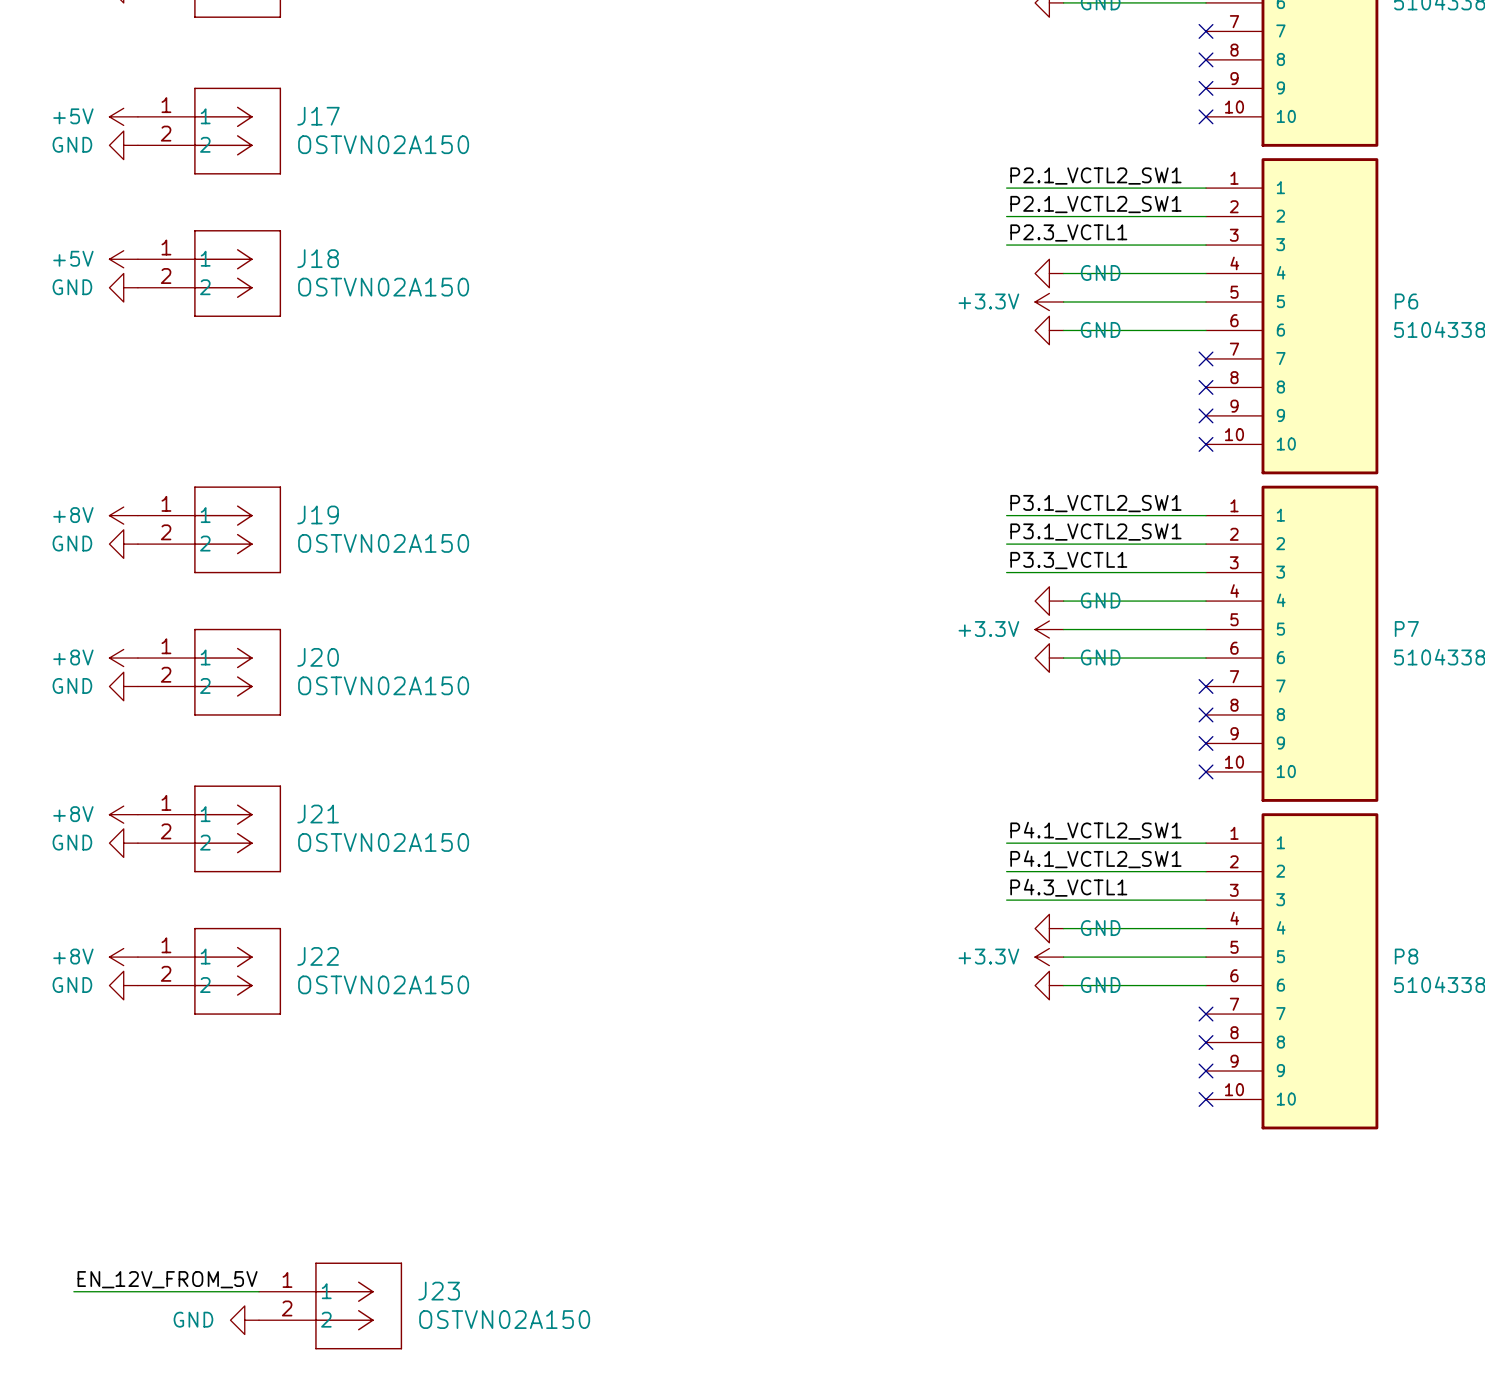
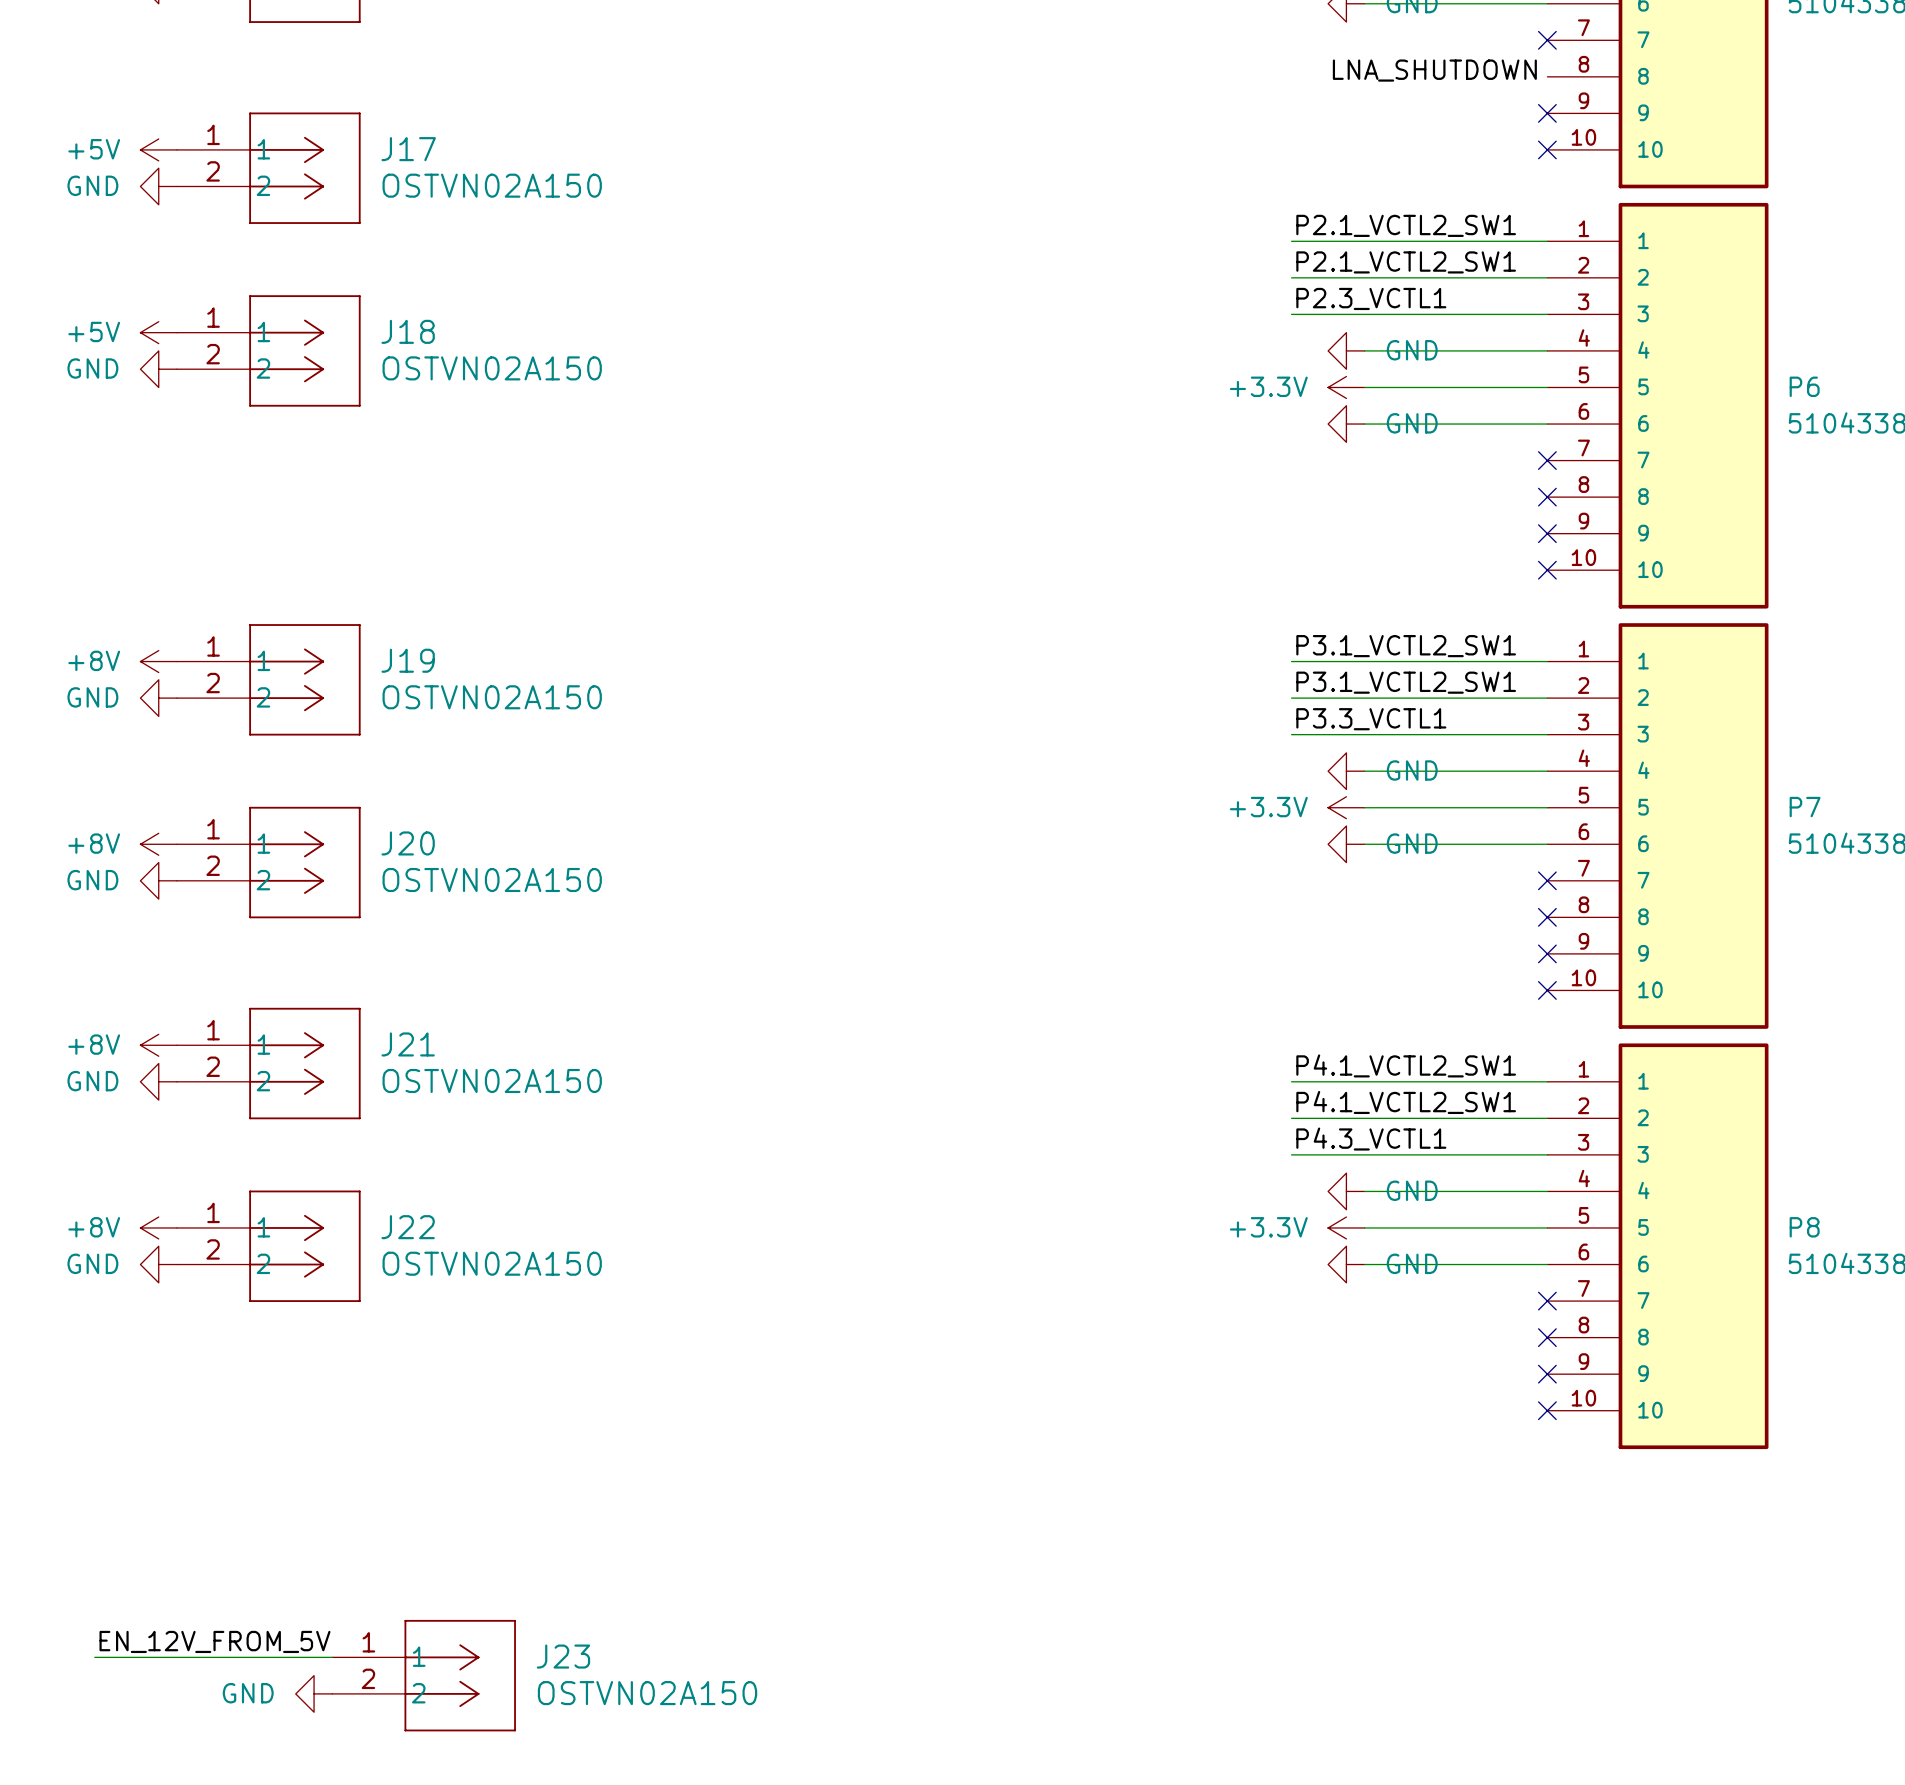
label: none -> LNA_SHUTDOWN (1434, 70)
no-connect mark: (1206, 59) -> none

